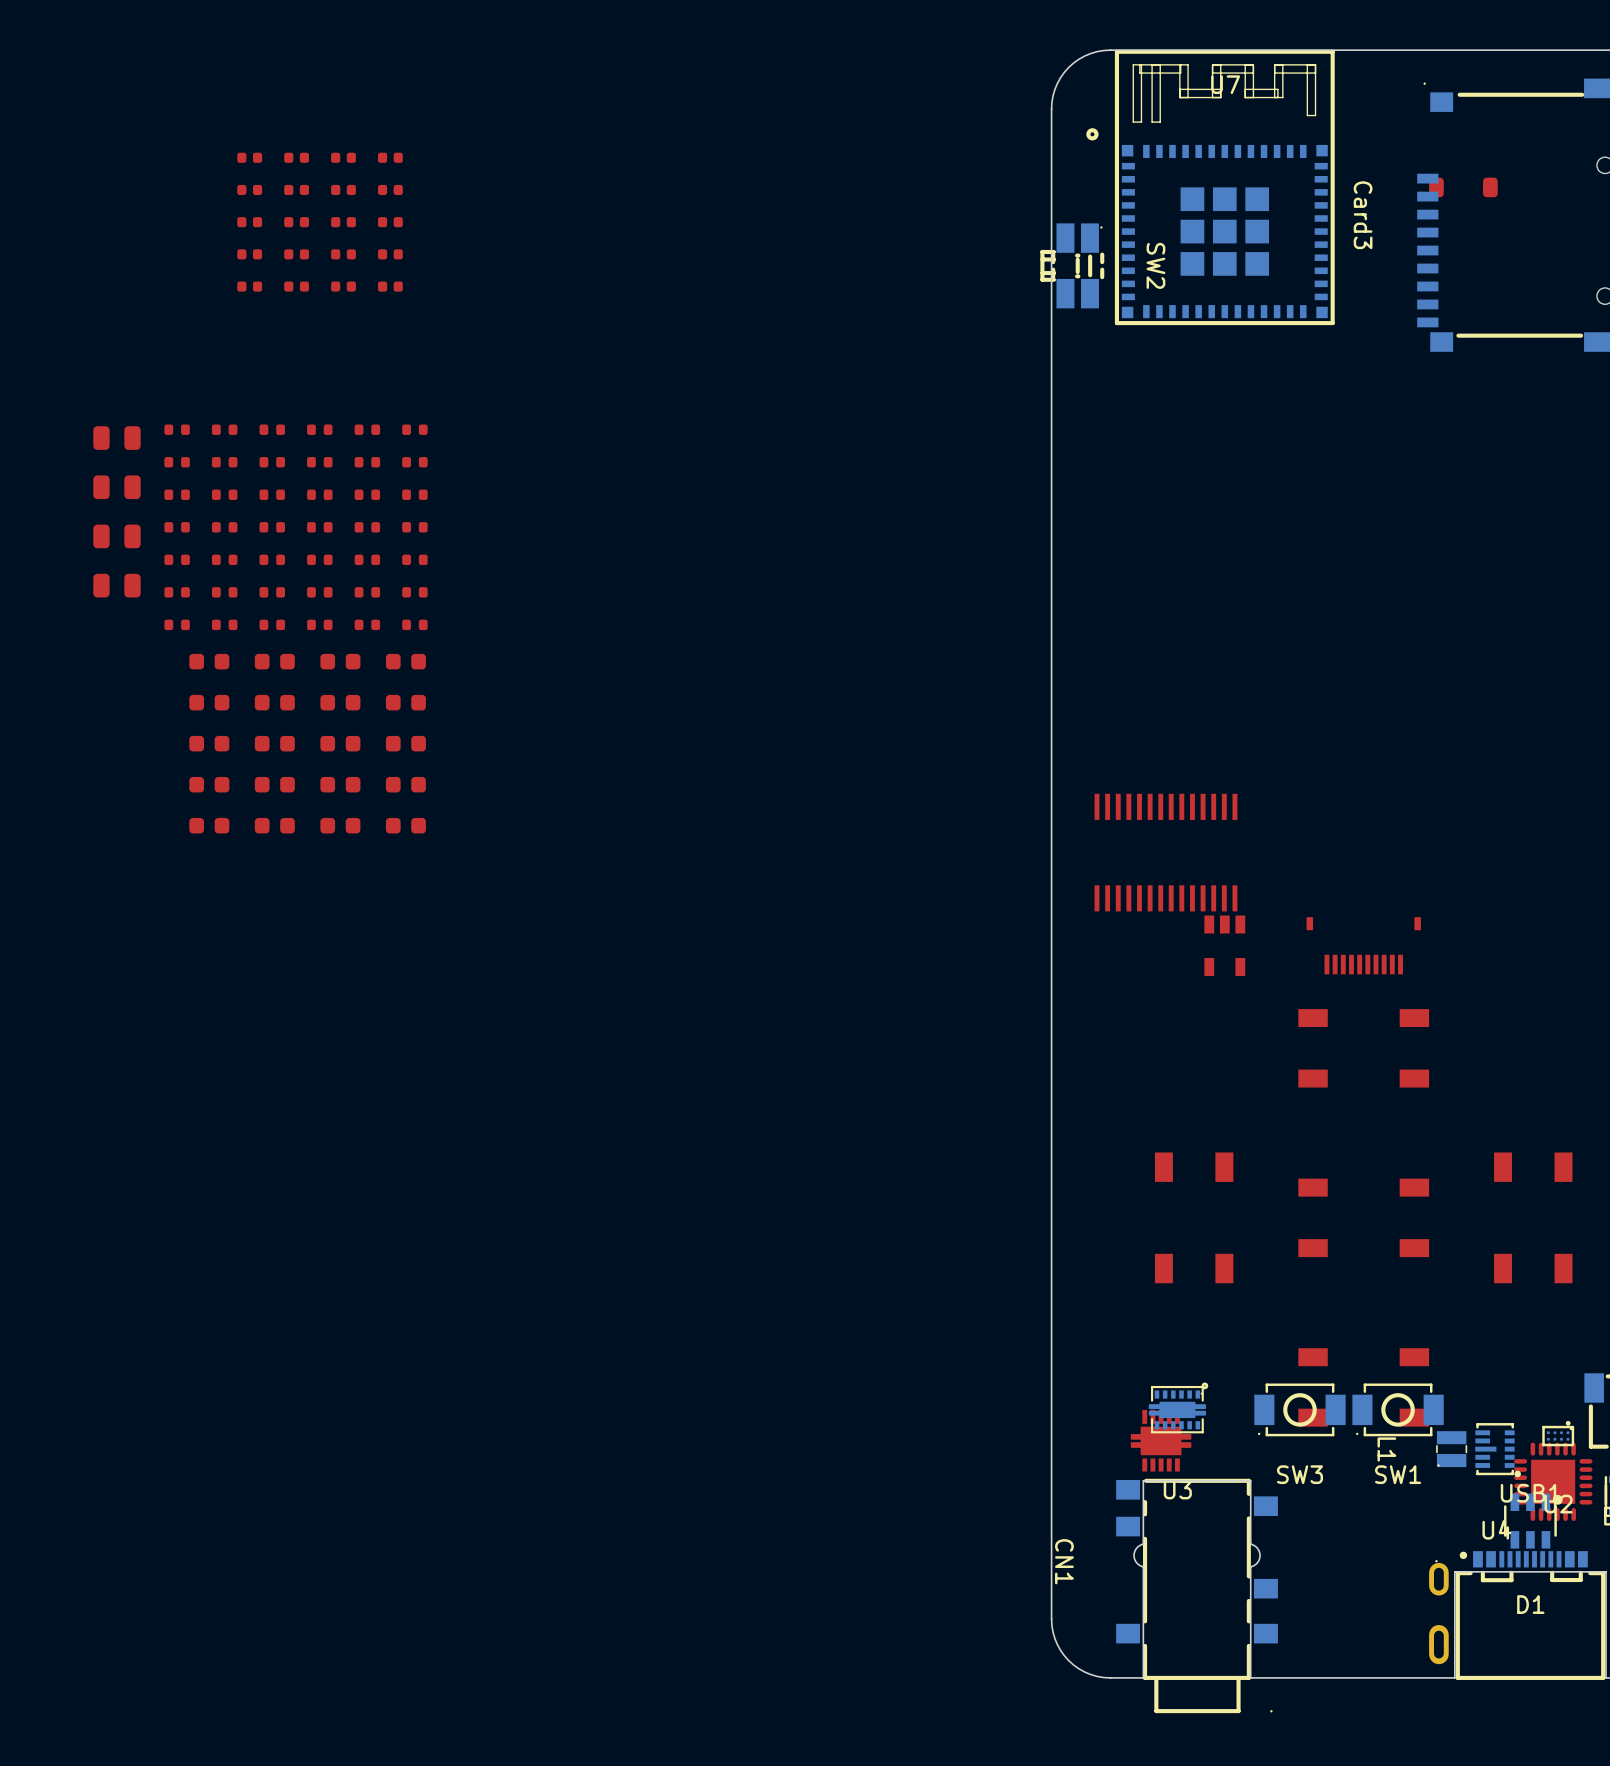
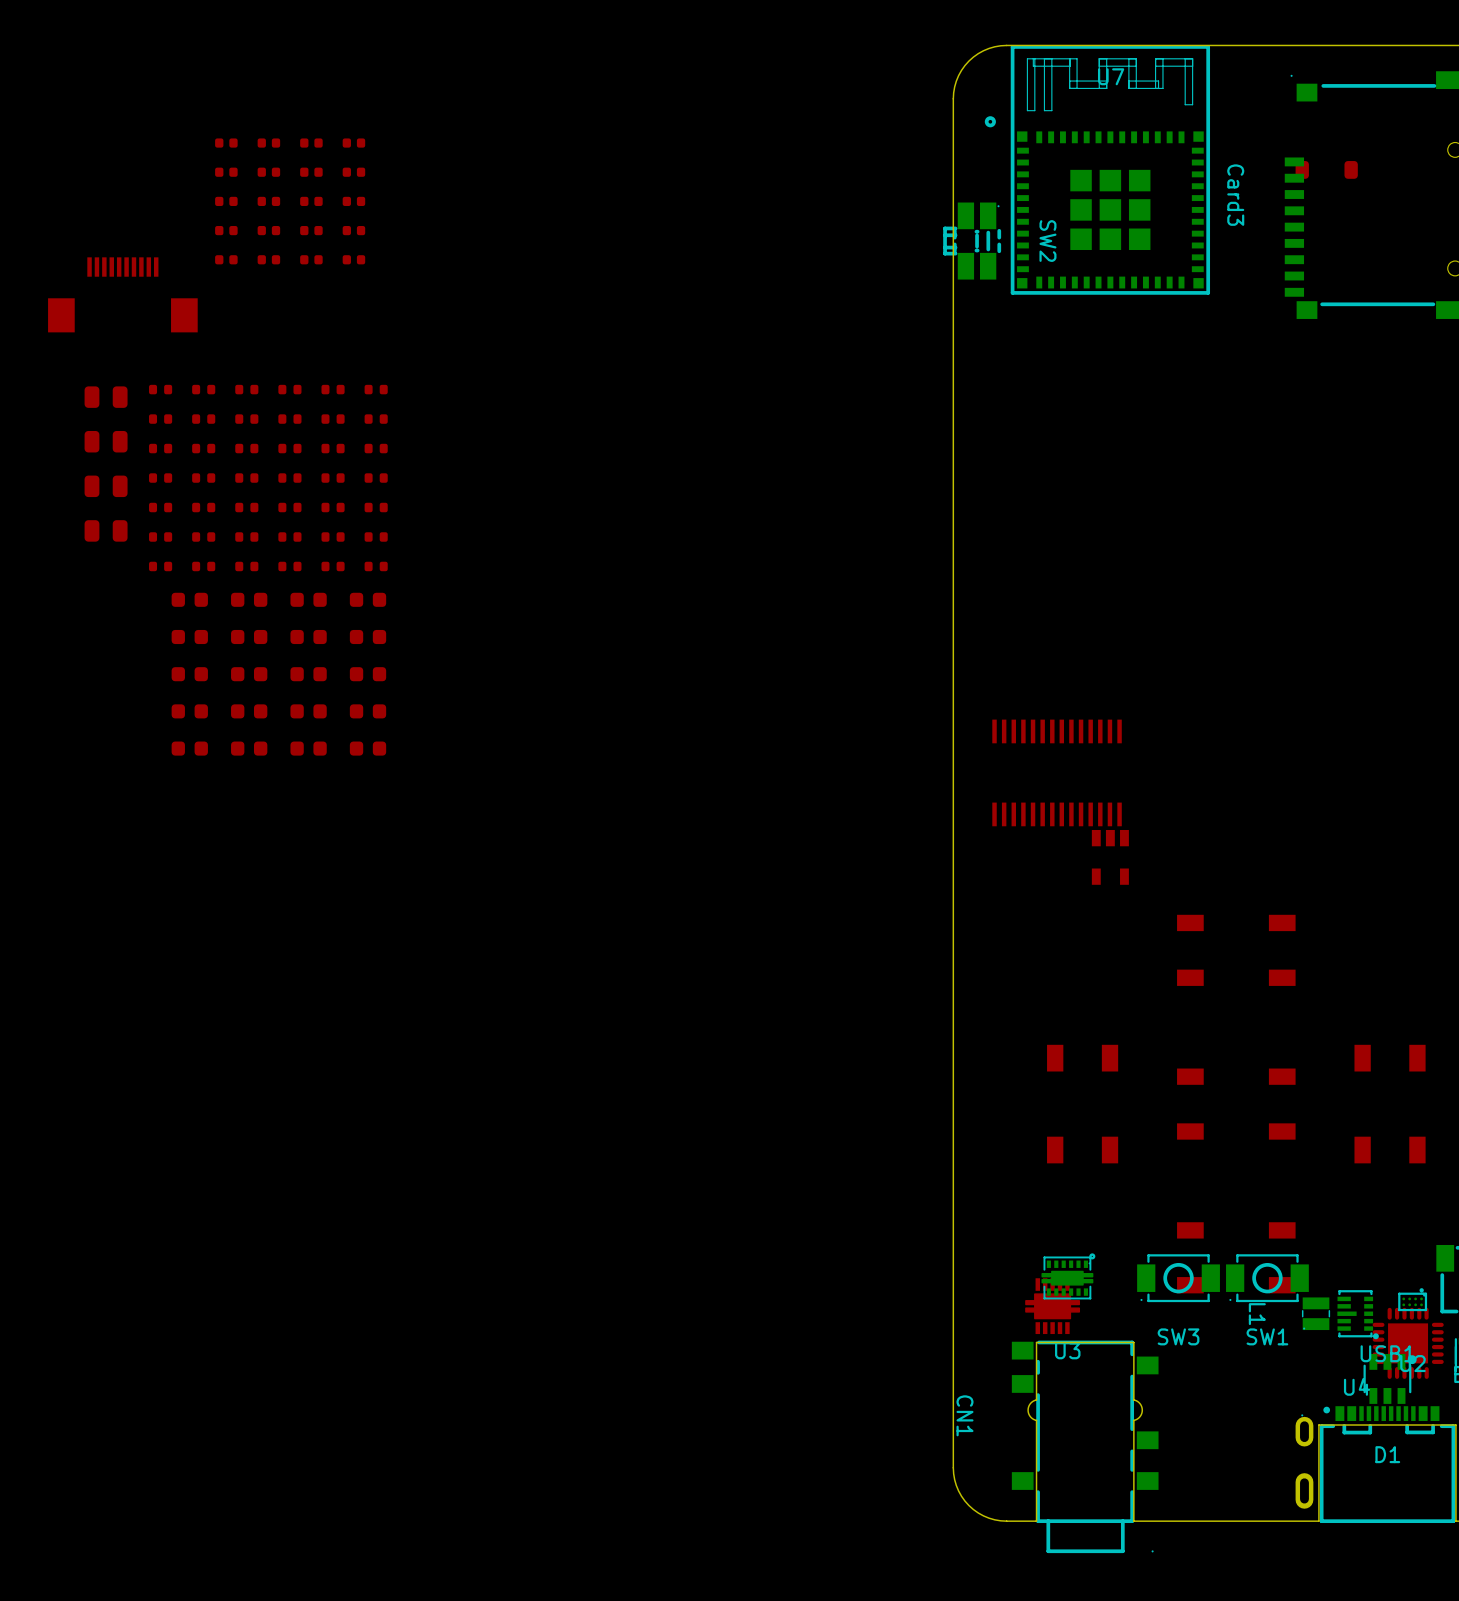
part: none -> (122, 294)
part: (1363, 945) -> none

